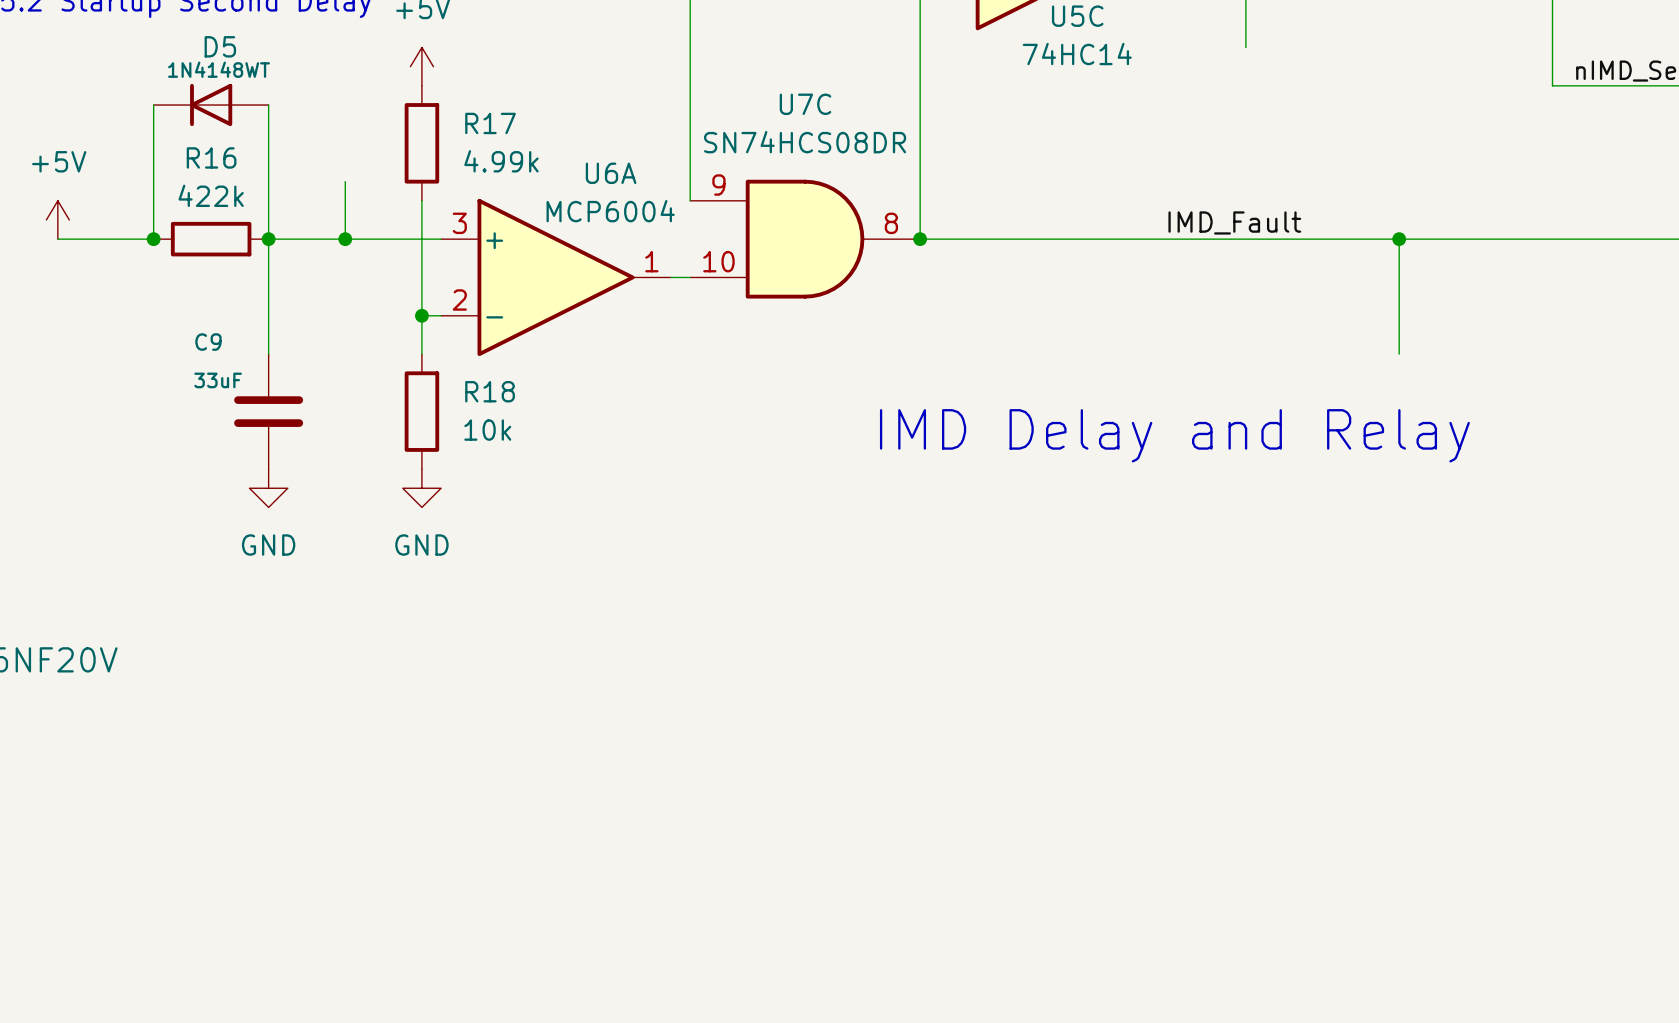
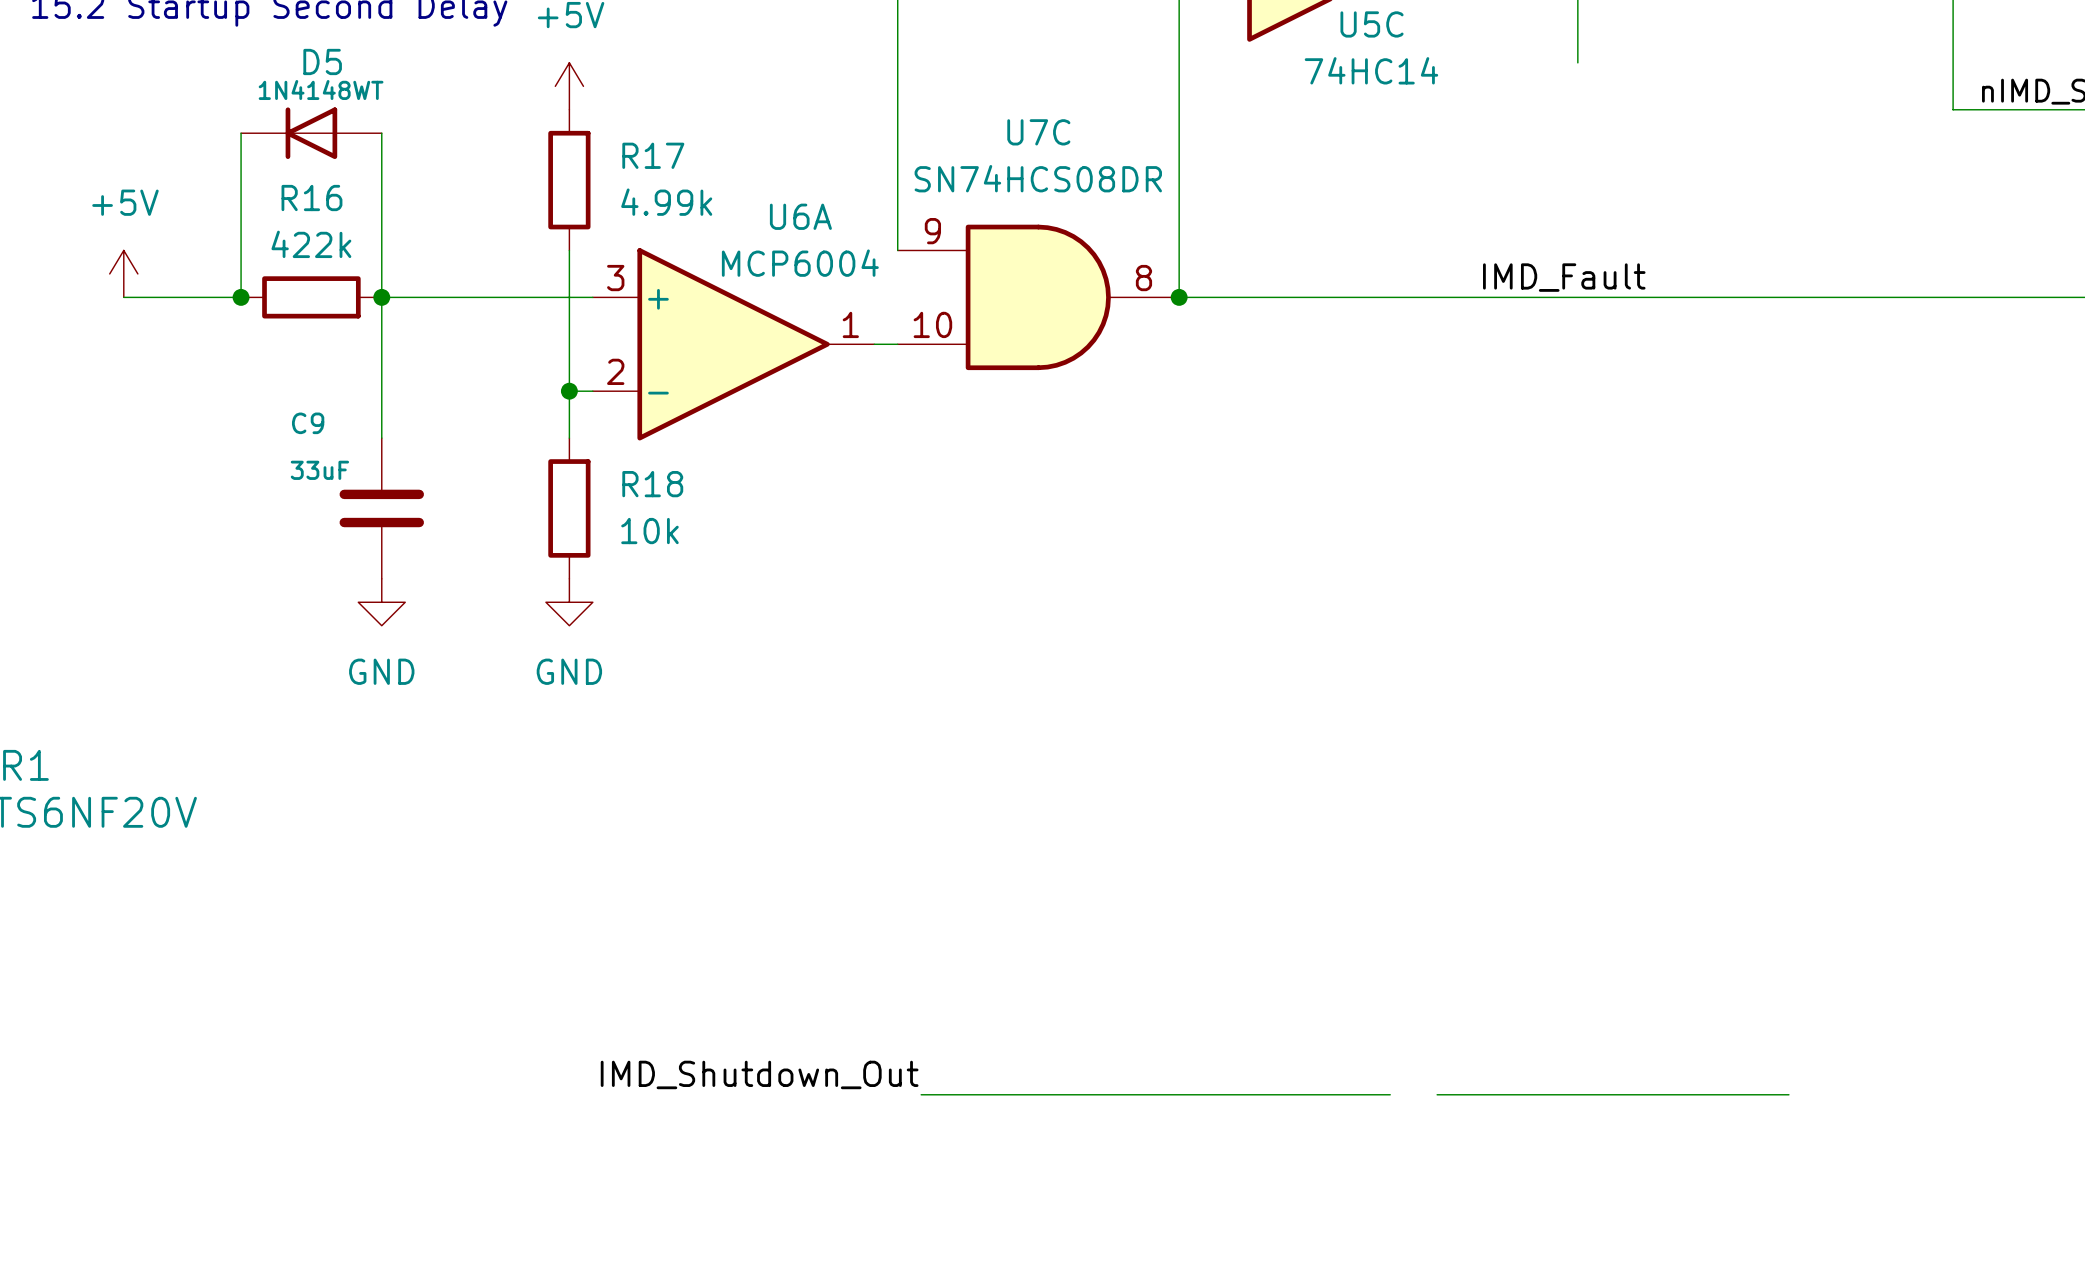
wire: (345, 181) (345, 239) -> none
junction: (345, 239) -> none
wire: (1399, 239) (1399, 354) -> none
junction: (1399, 239) -> none
text: IMD Delay and Relay (1174, 435) -> none
label: none -> IMD_Shutdown_Out (759, 1074)
wire: none -> (921, 1094) (1390, 1094)
wire: none -> (1437, 1094) (1788, 1094)

